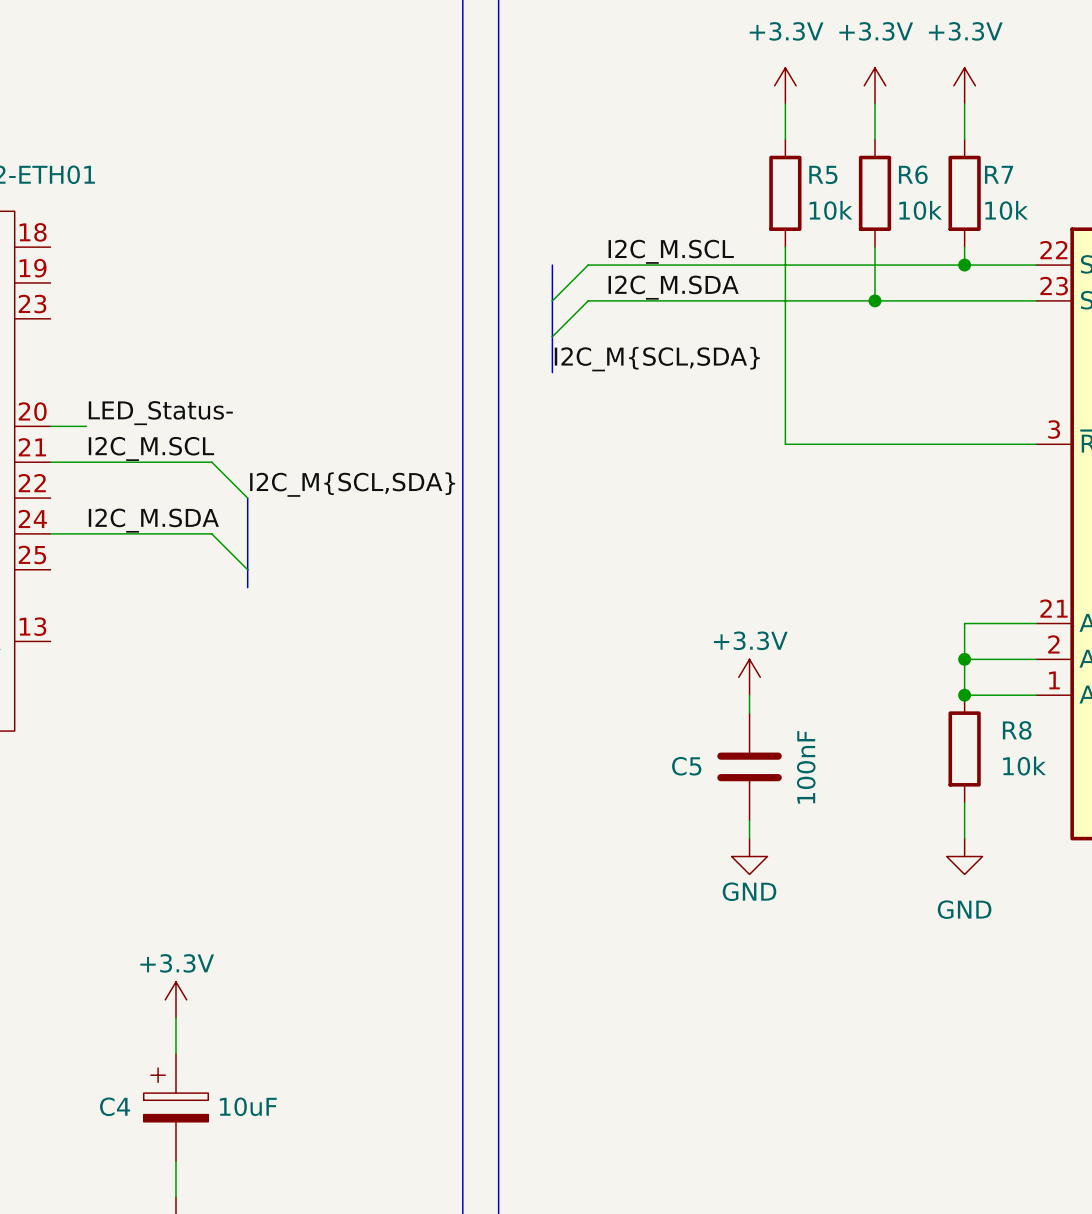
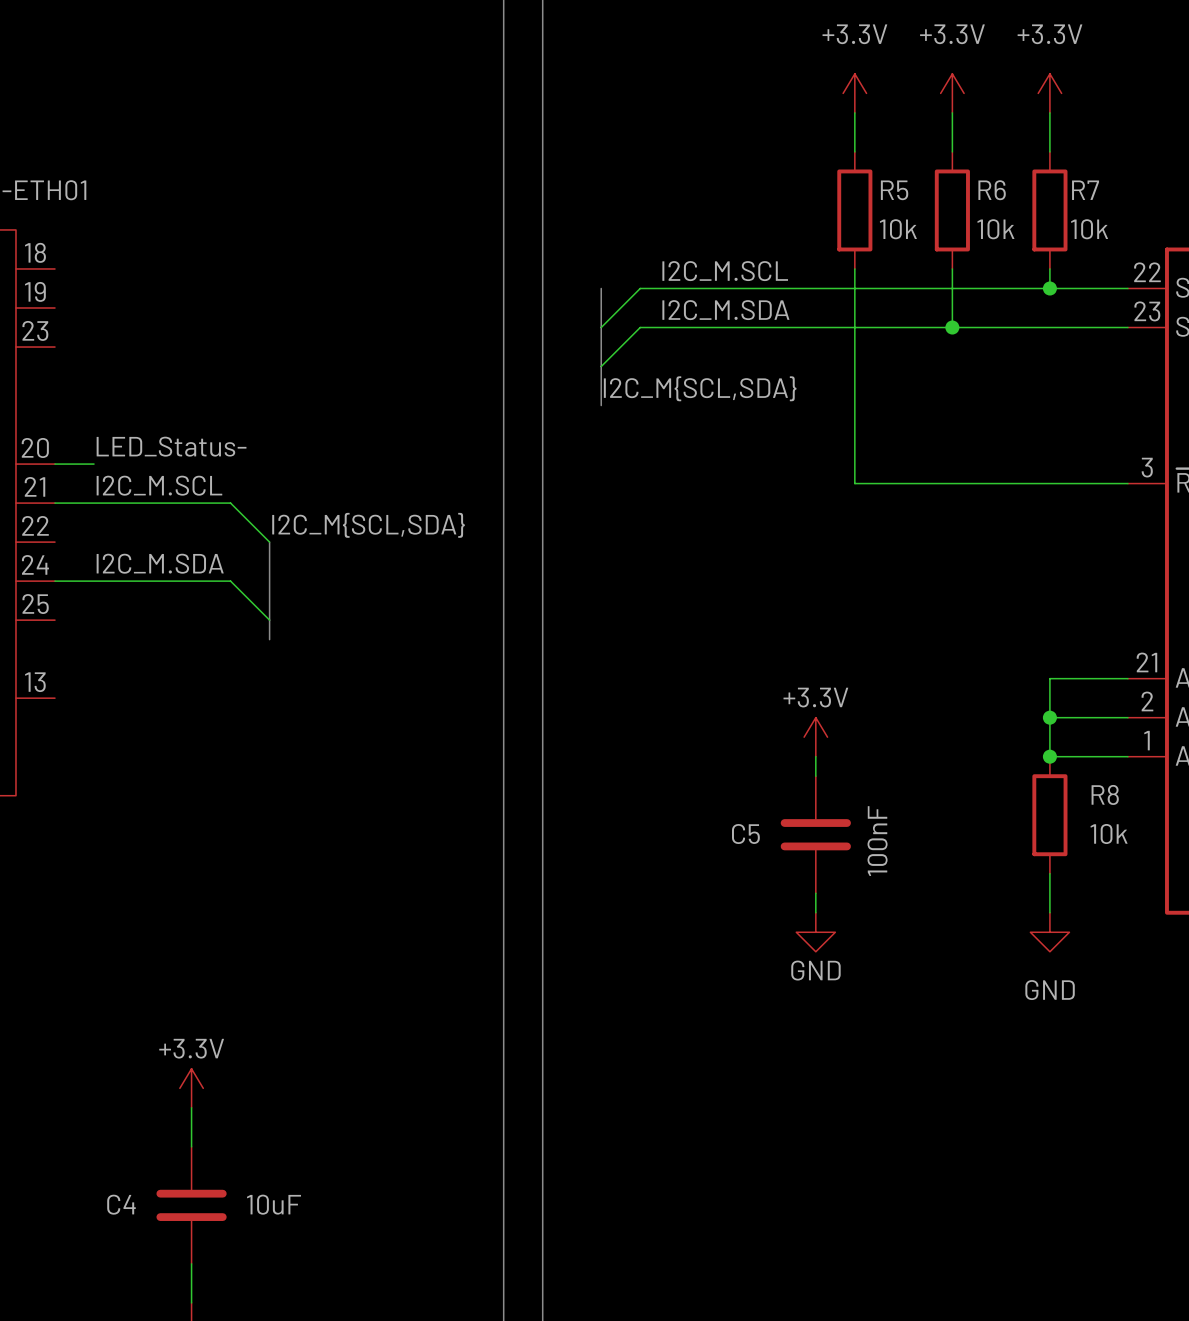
C4 symbol: [143, 1053, 209, 1162] -> [156, 1146, 227, 1264]

